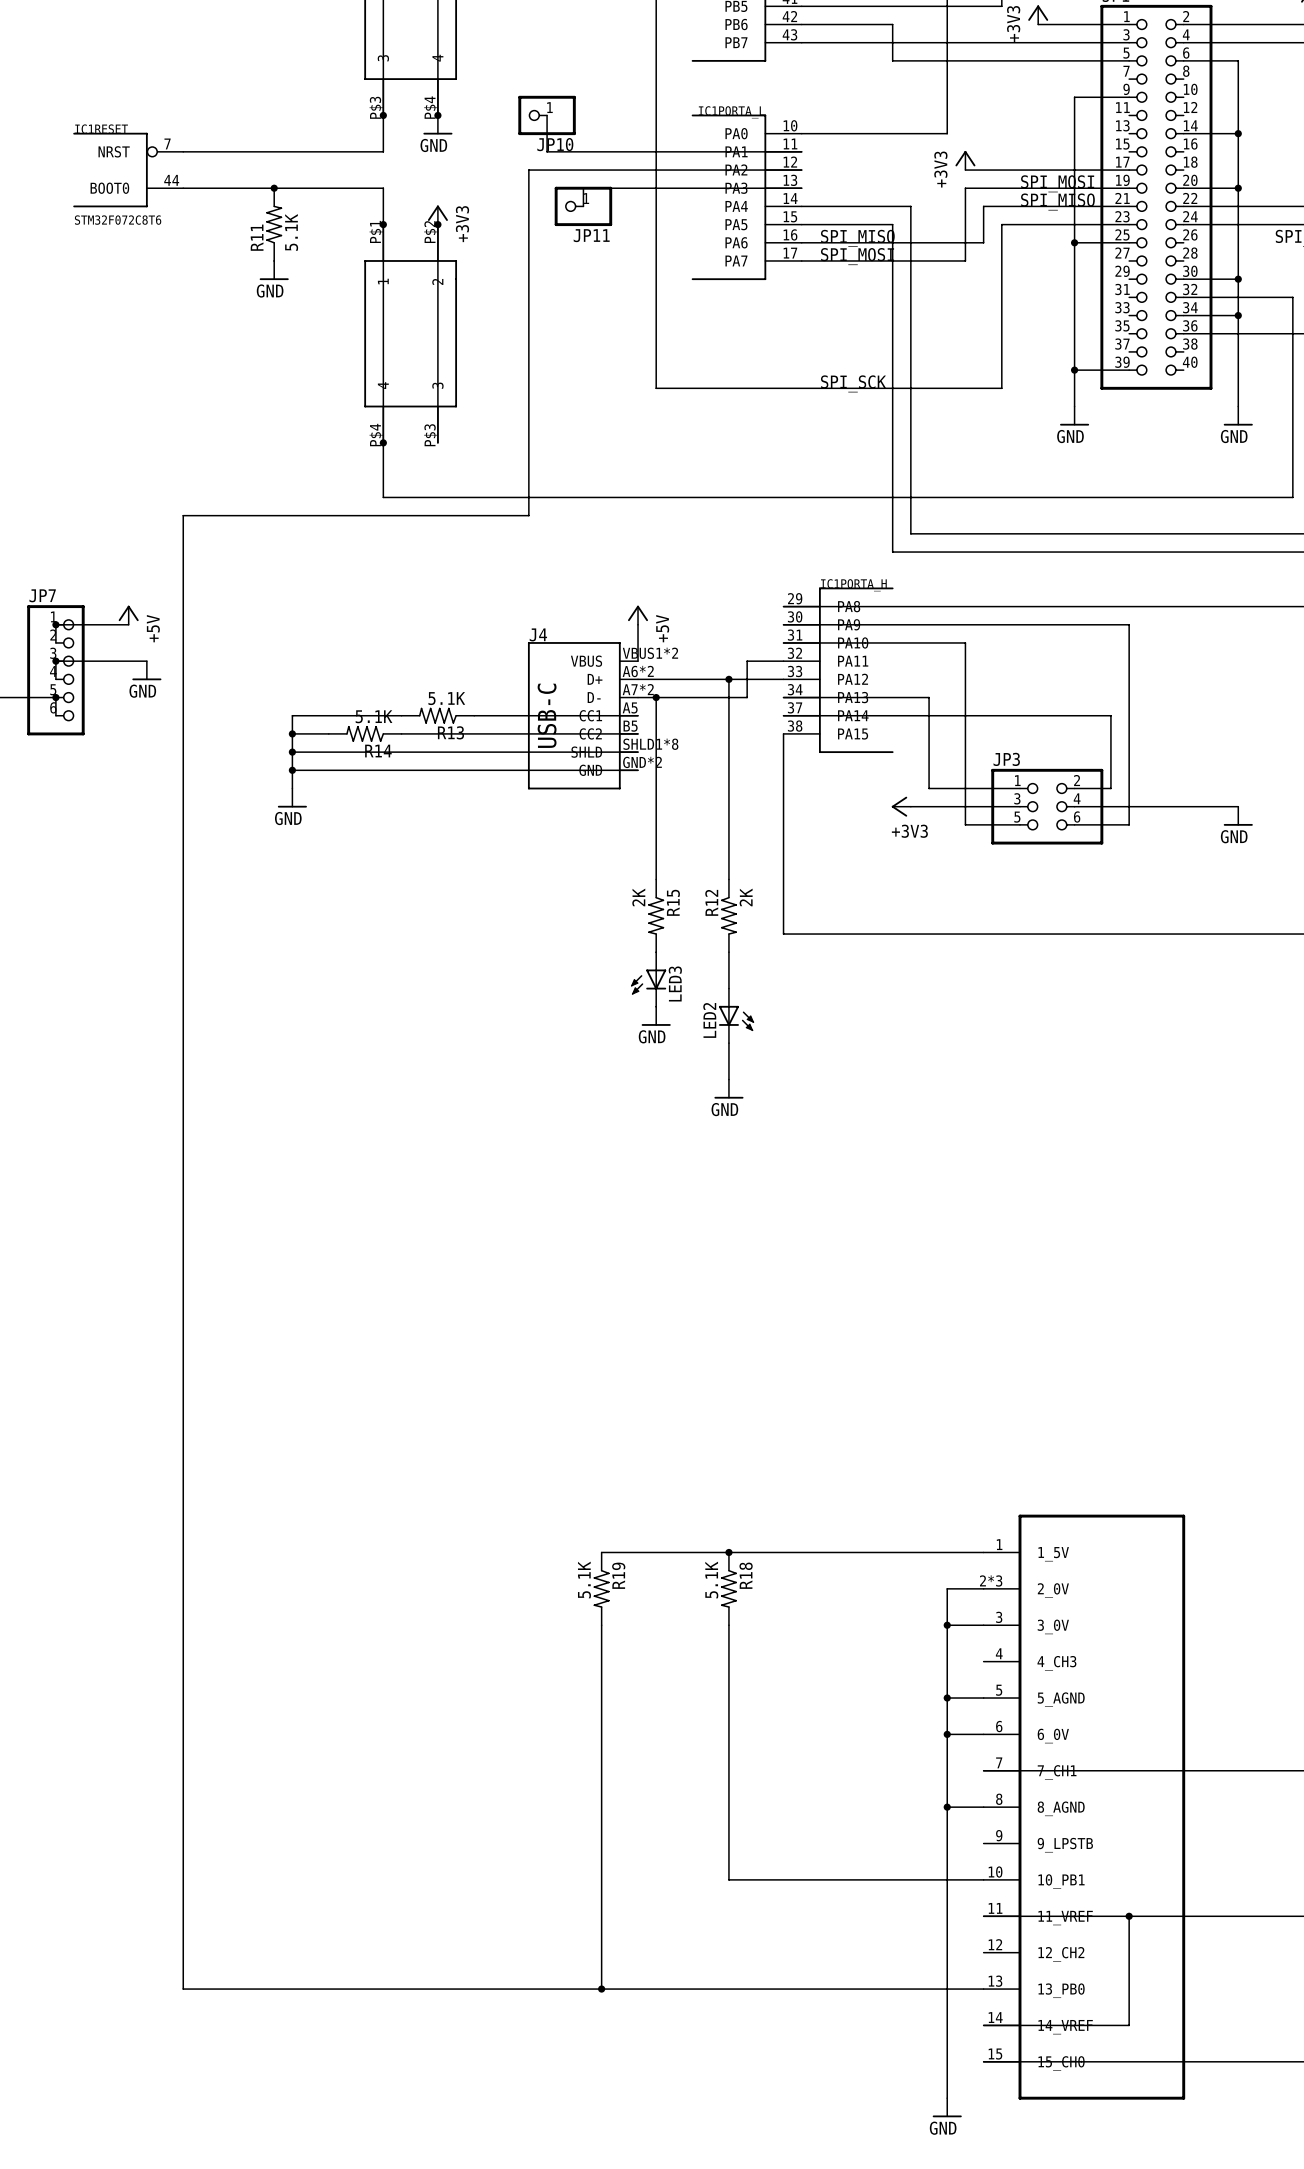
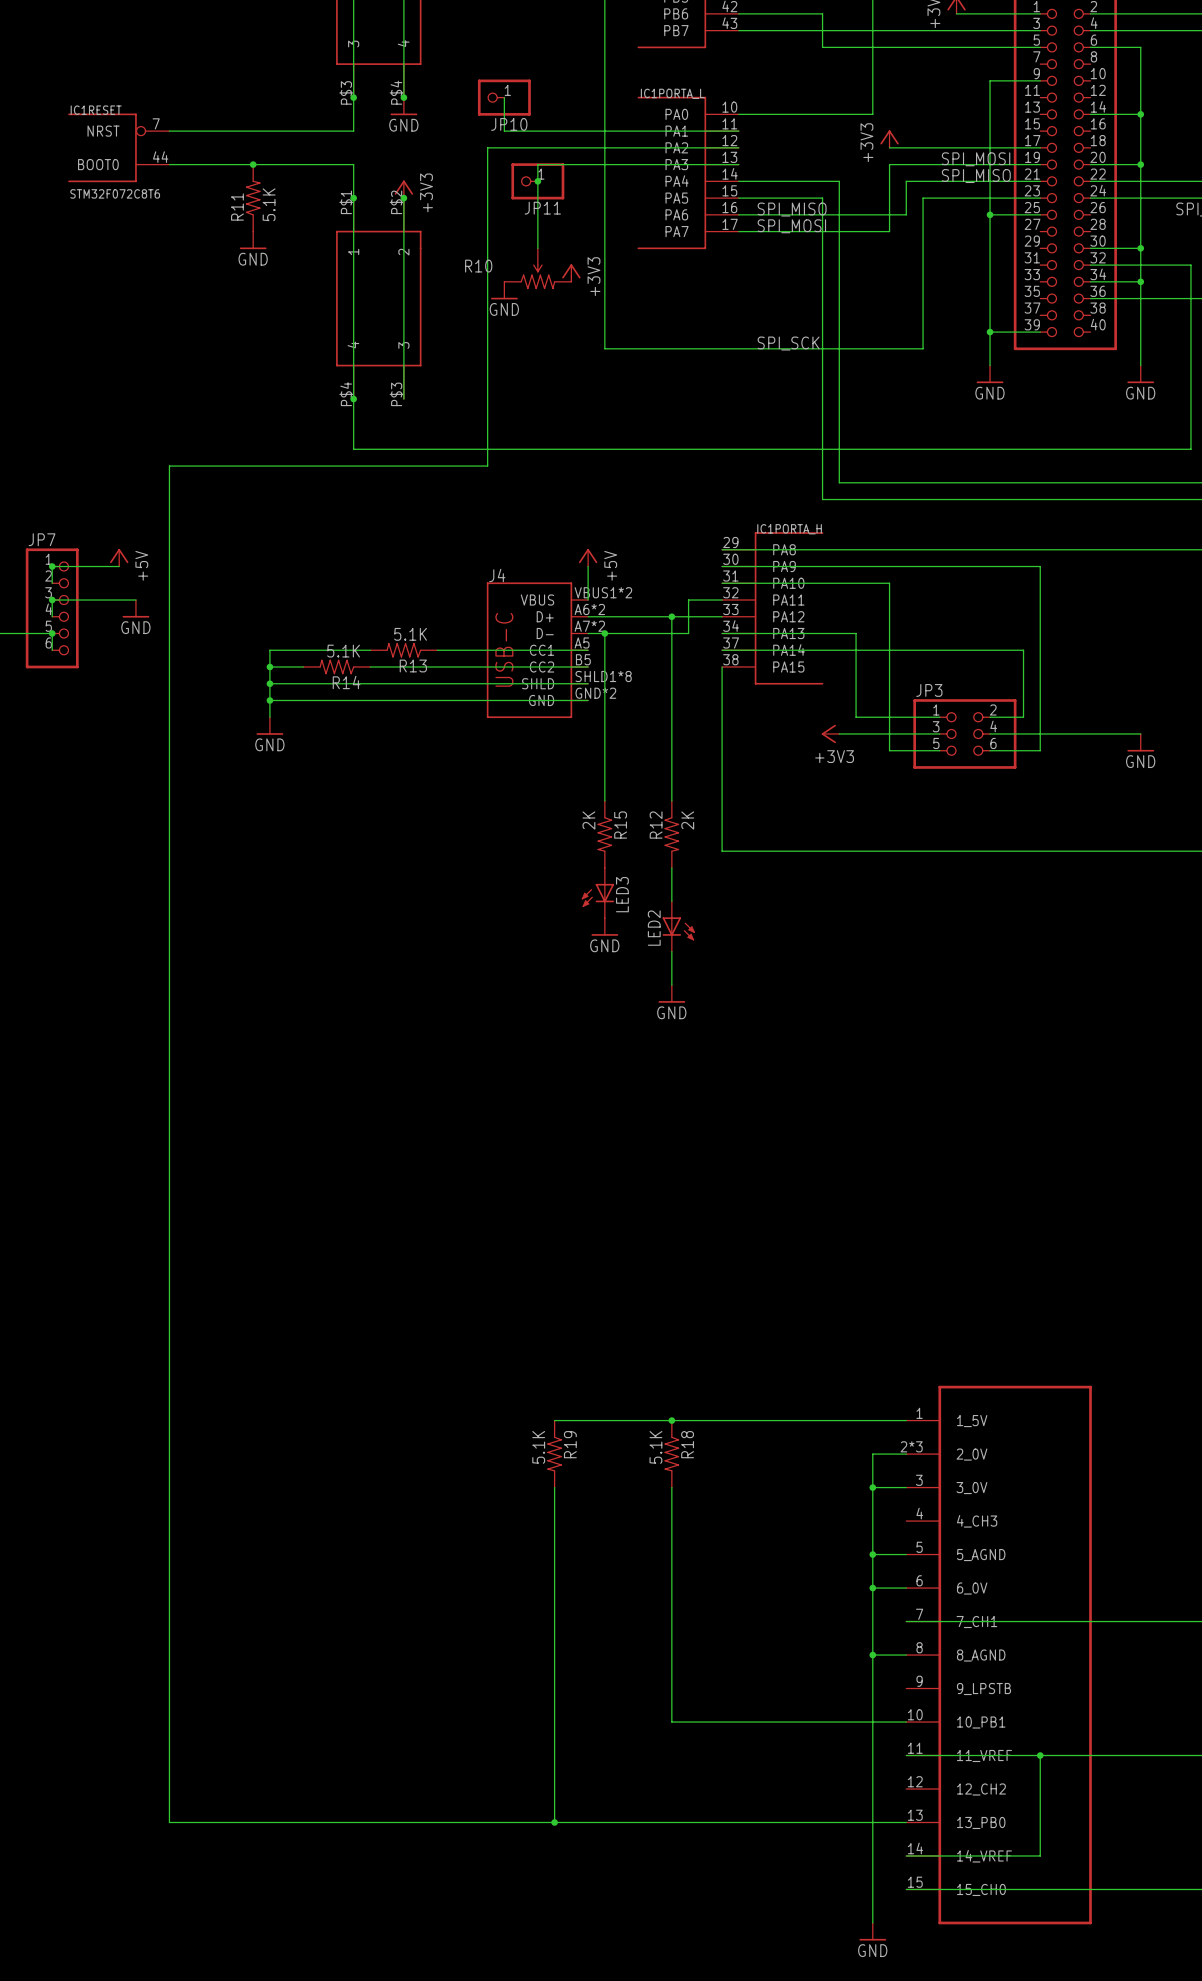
wire: none -> (537, 181) (537, 248)
junction: none -> (537, 181)
R10: none -> (537, 268)
power symbol: none -> +3V3 (571, 273)
power symbol: none -> GND (504, 290)

